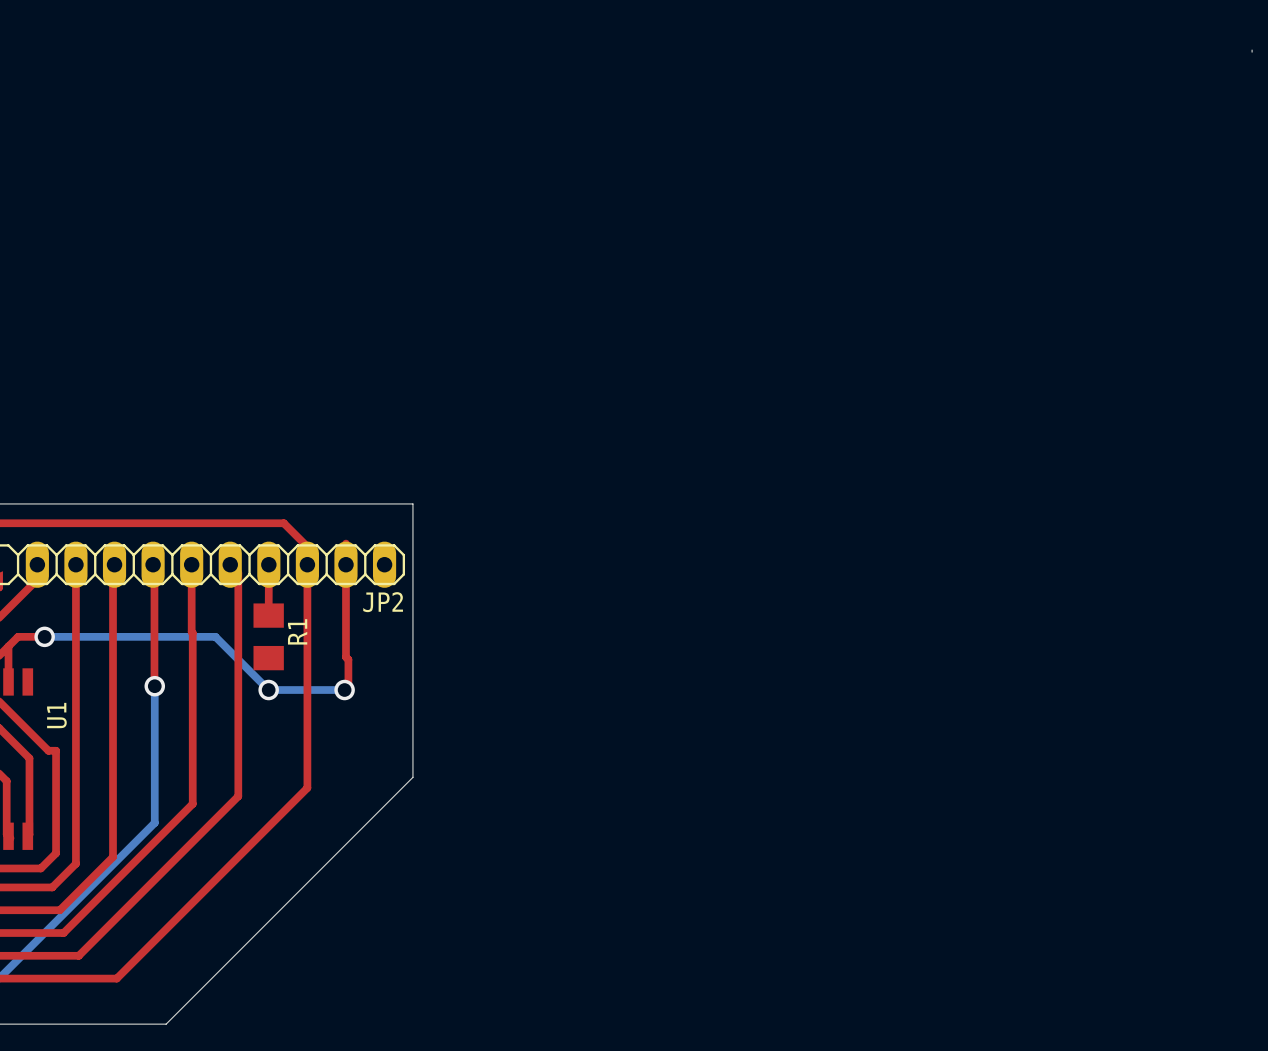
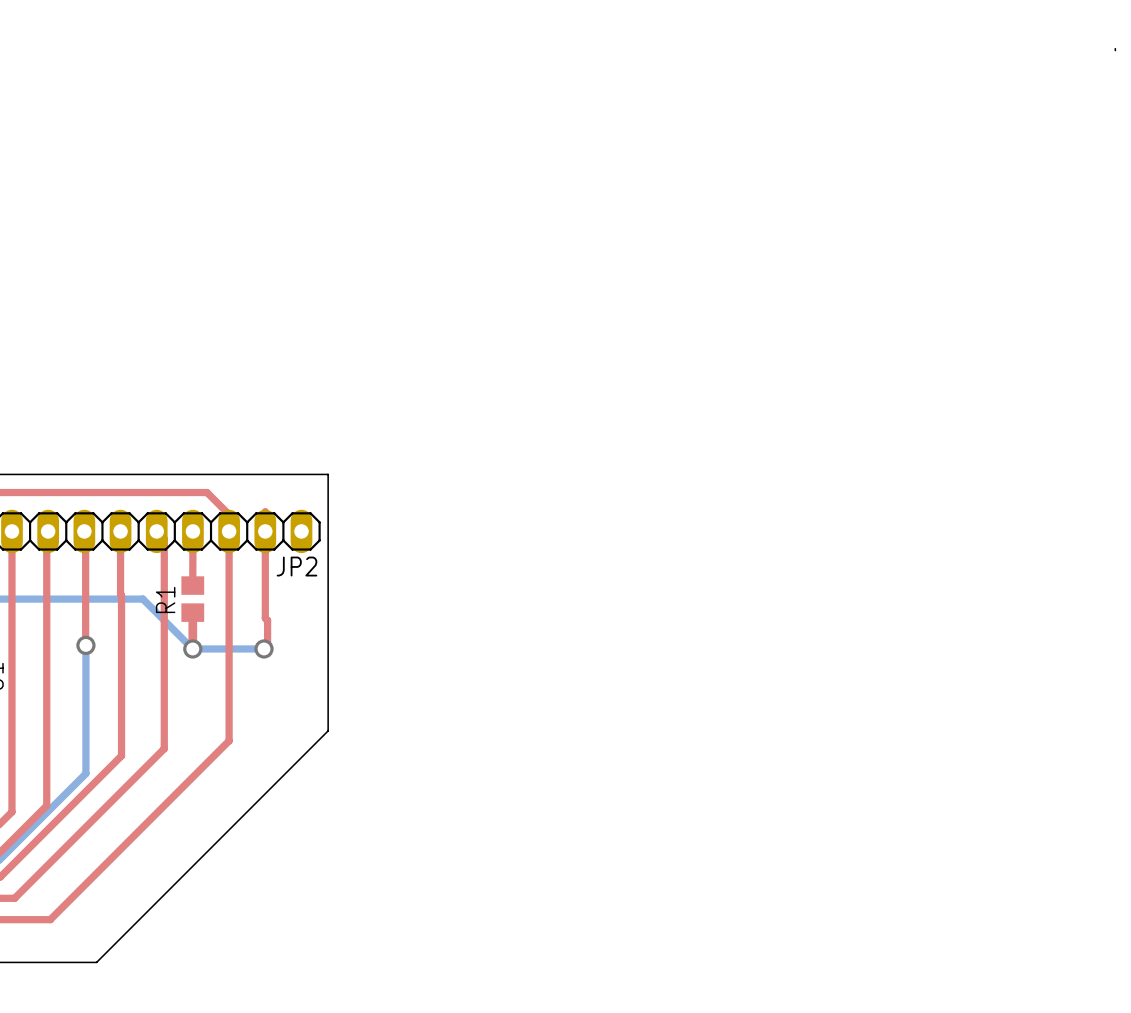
R1 footprint: [253, 603, 284, 671] -> [181, 576, 205, 622]
R1 name position: R1 (297, 631) -> R1 (165, 599)
top track: none -> (192, 619) (192, 648)

